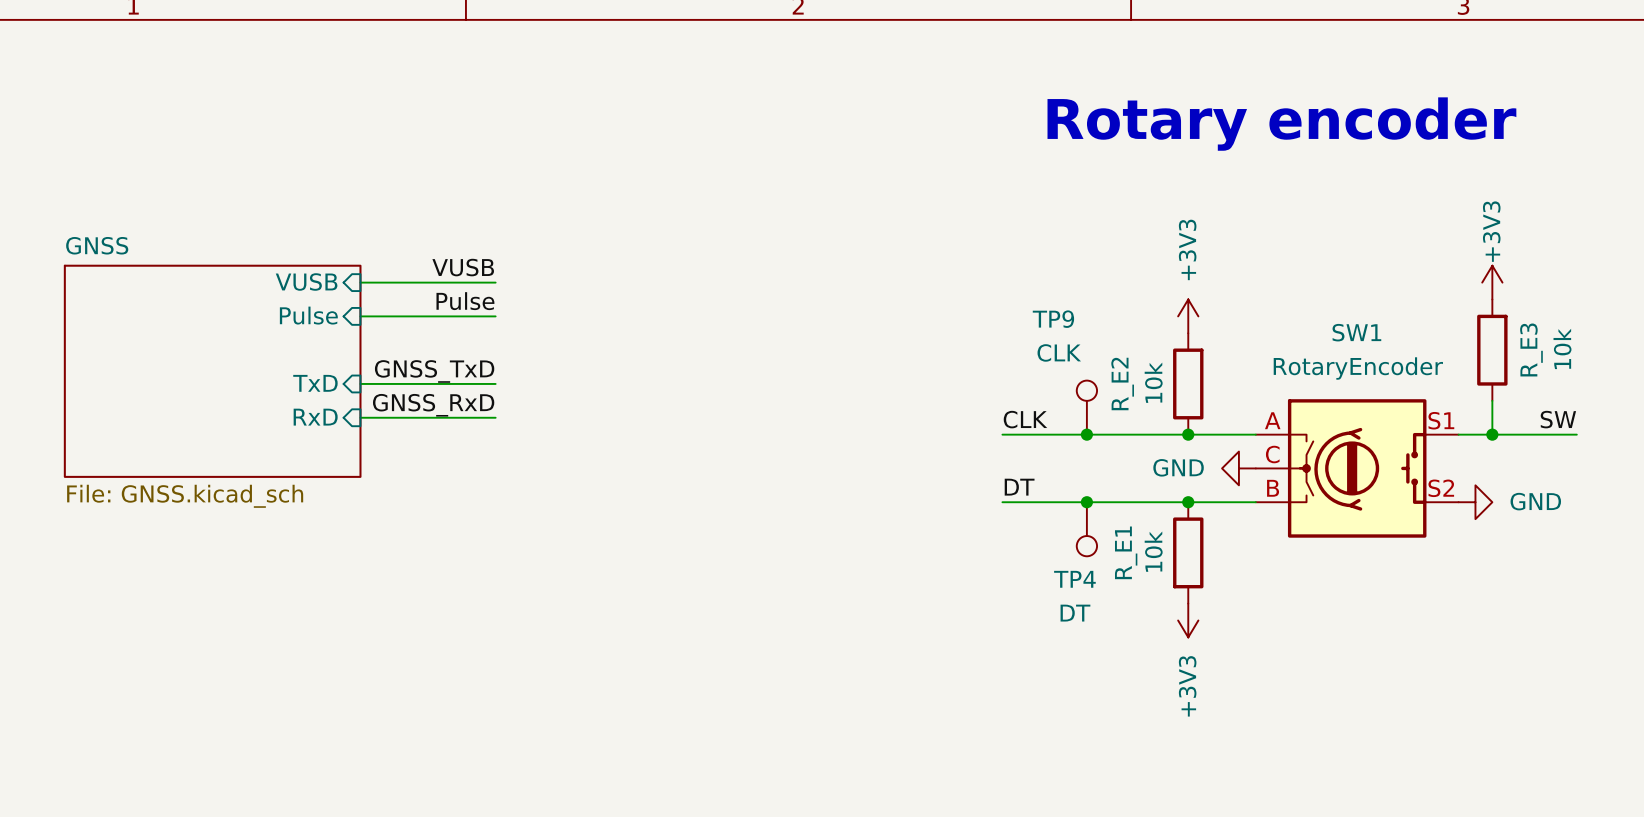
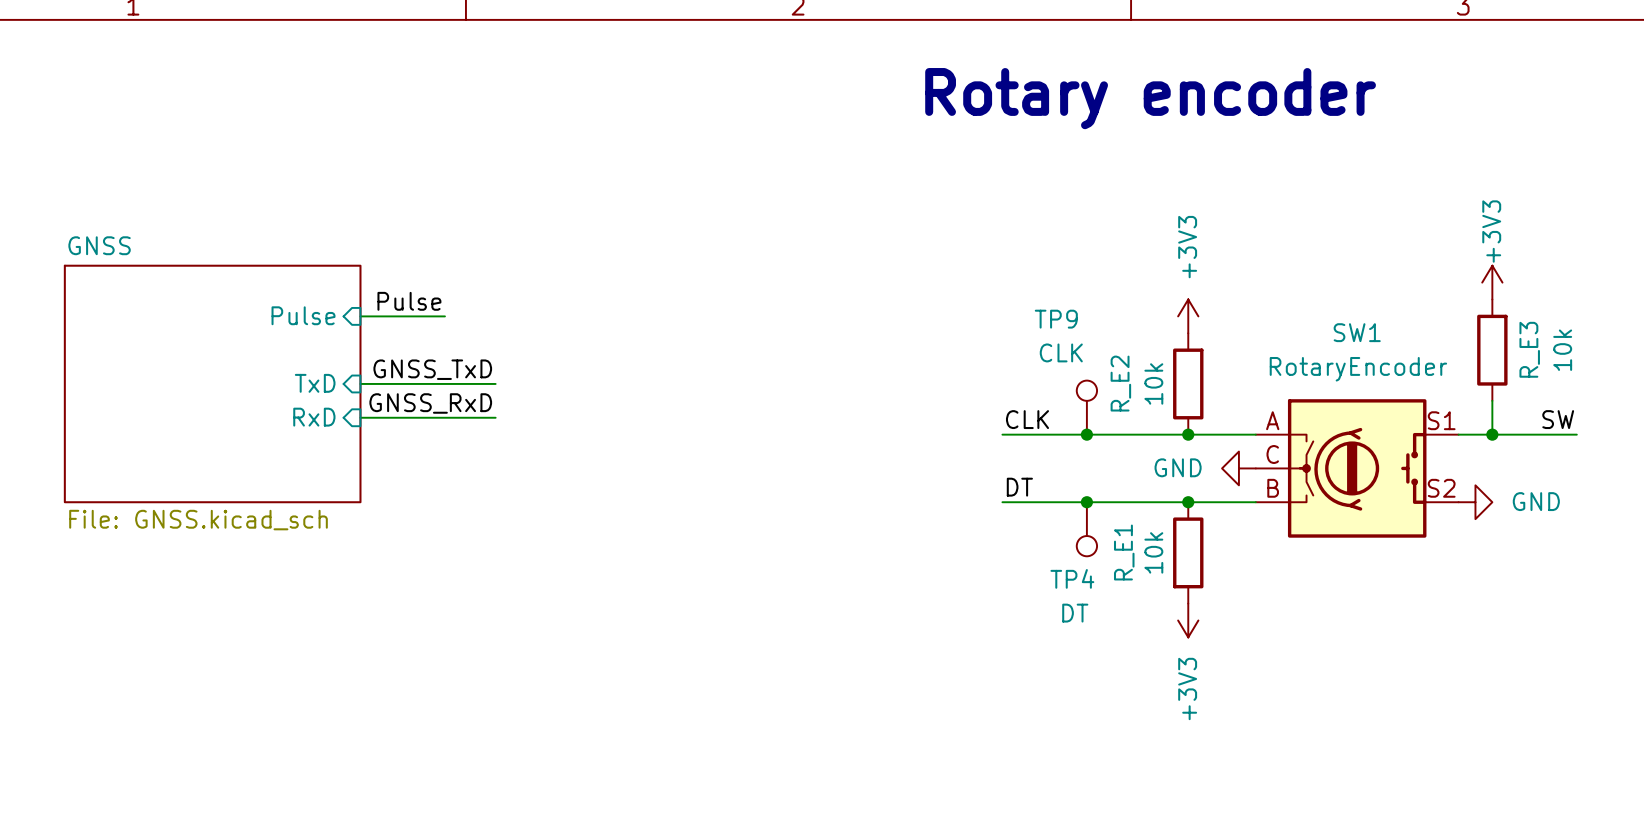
text position: Rotary encoder (1281, 124) -> Rotary encoder (1150, 98)
sheet GNSS shape: [63, 264, 362, 478] -> [63, 264, 362, 504]
label: VUSB (463, 267) -> none
sheet pin: VUSB (306, 281) -> none
wire: (360, 282) (495, 282) -> none
label position: Pulse (465, 301) -> Pulse (409, 301)
wire: (444, 316) (495, 316) -> none

